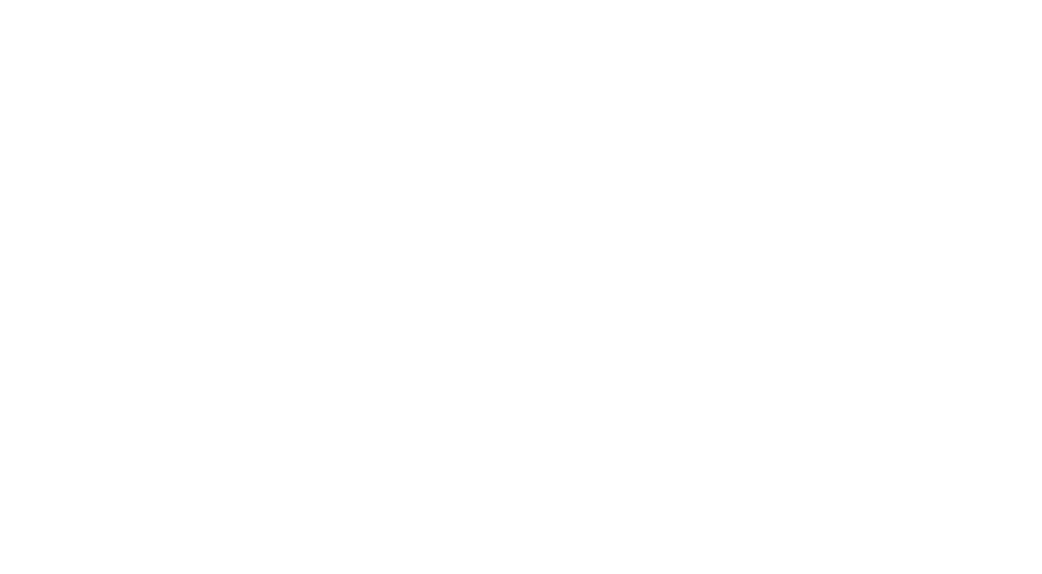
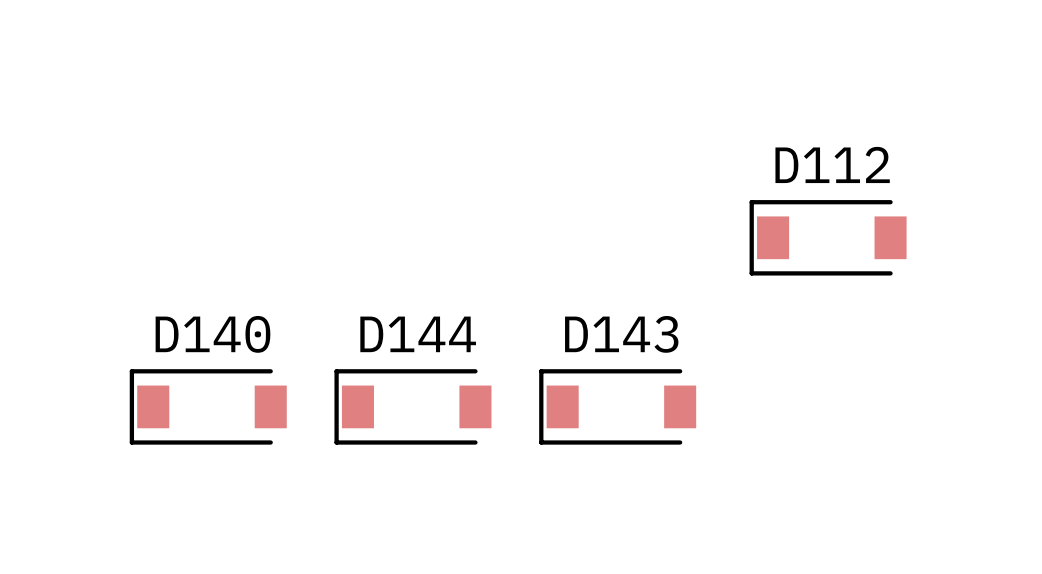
D112: none -> (828, 237)
D140: none -> (208, 406)
D144: none -> (412, 406)
D143: none -> (617, 406)

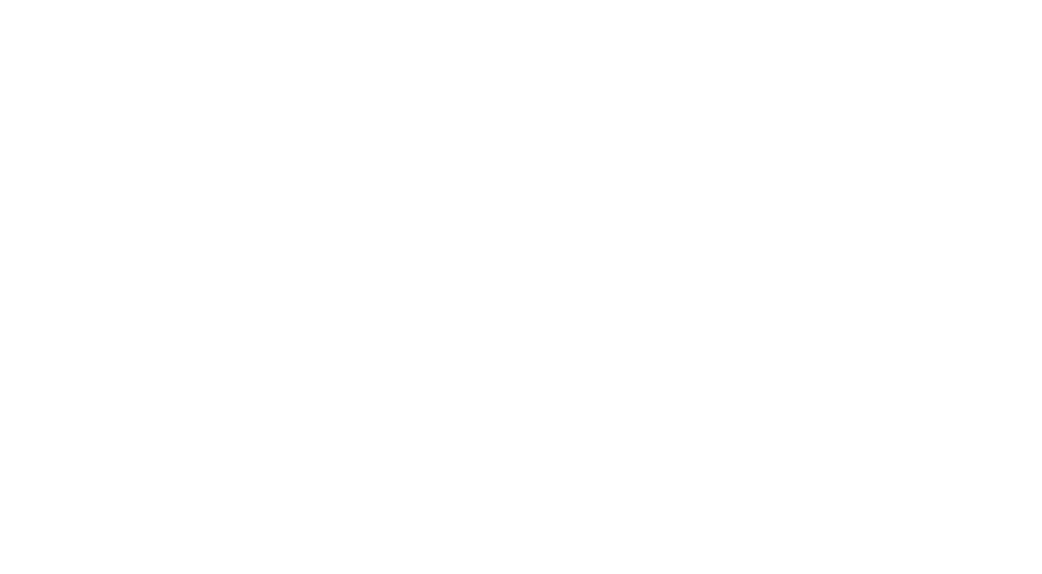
D112: (828, 237) -> none
D140: (208, 406) -> none
D144: (412, 406) -> none
D143: (617, 406) -> none

